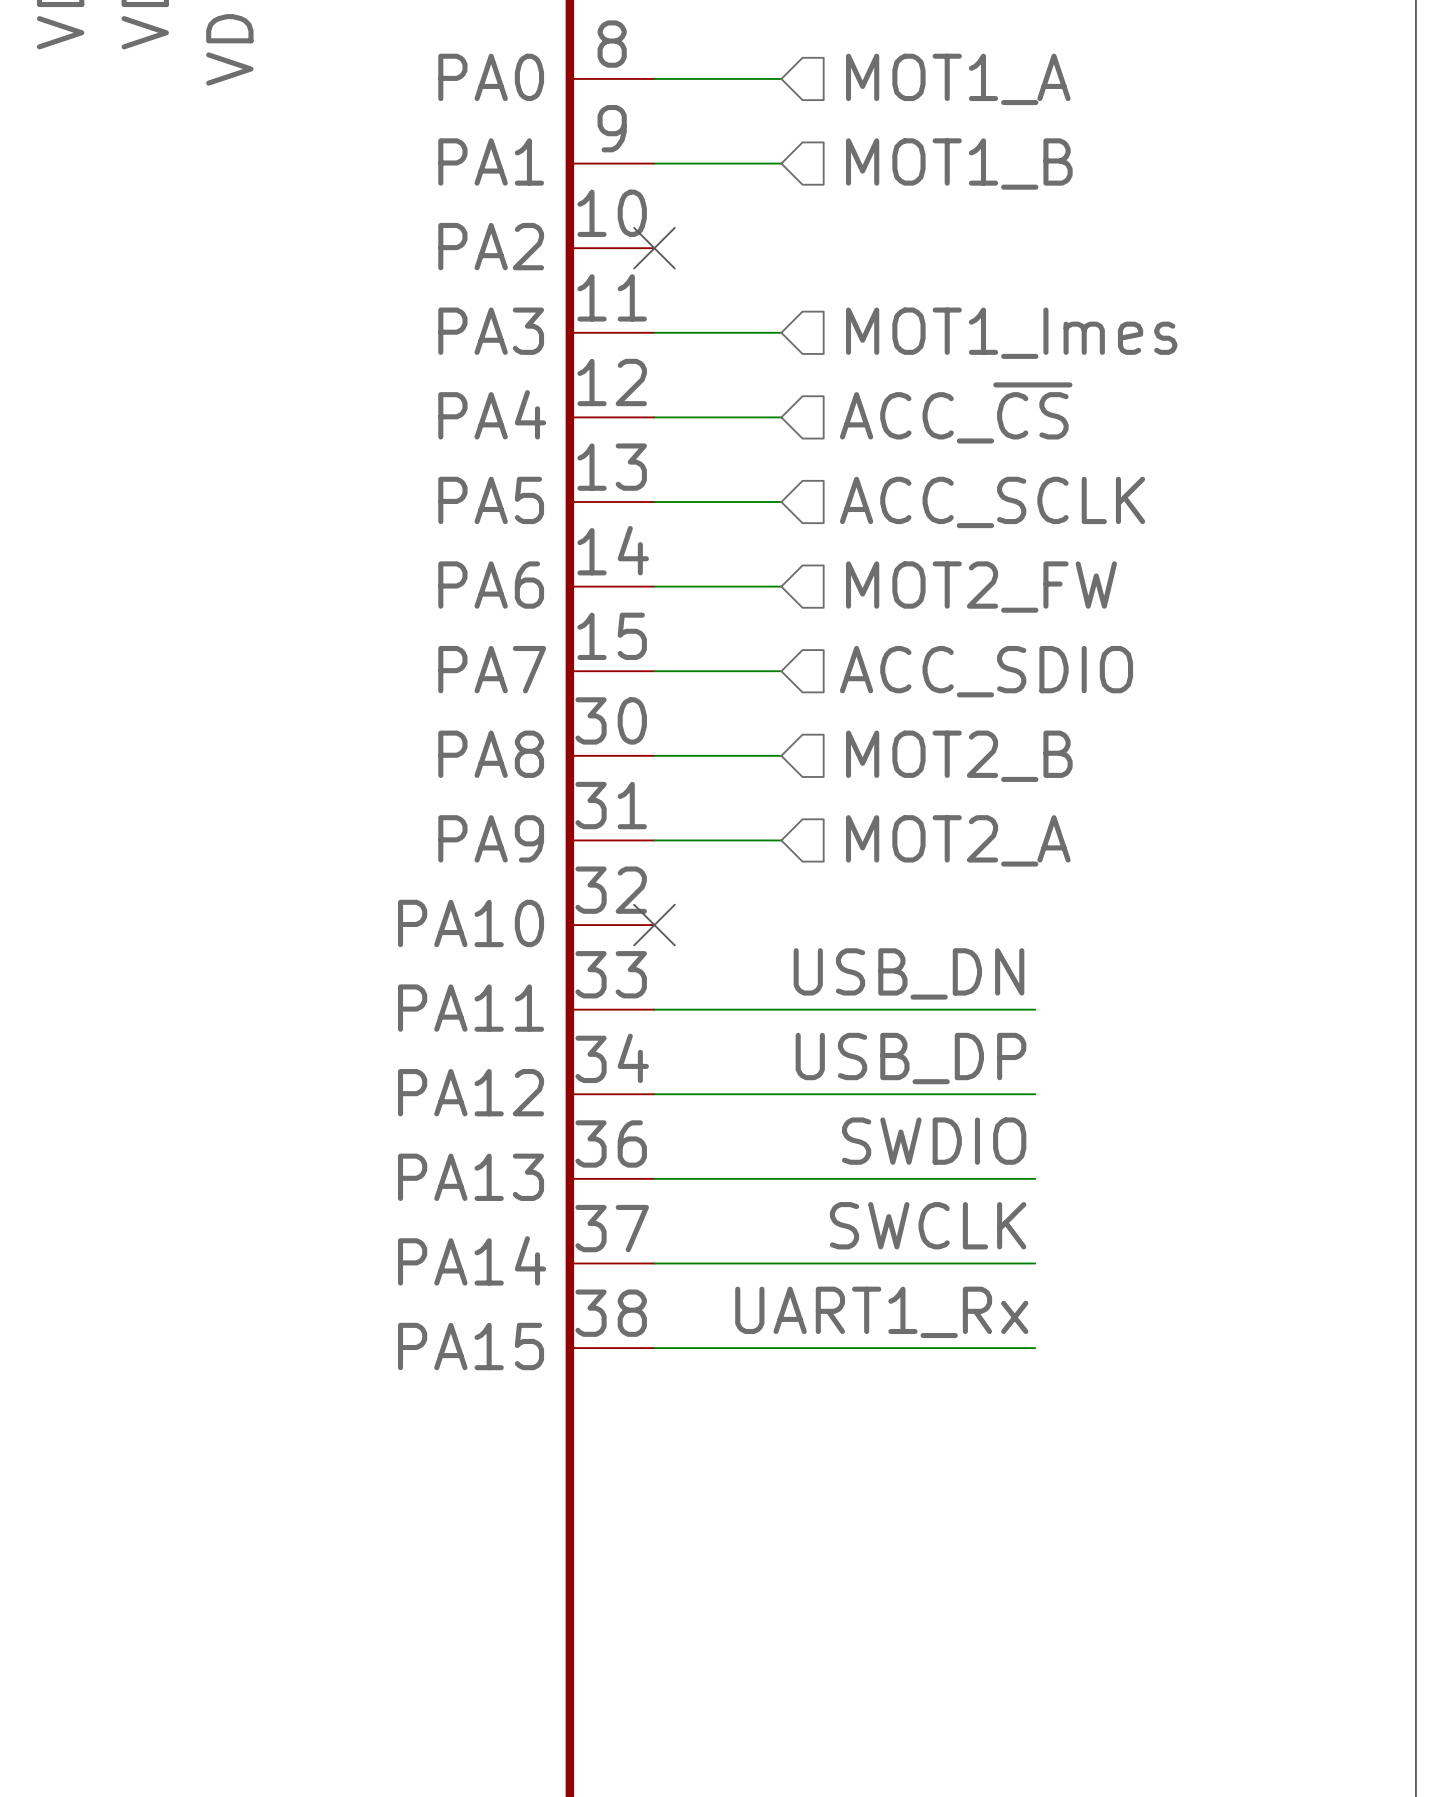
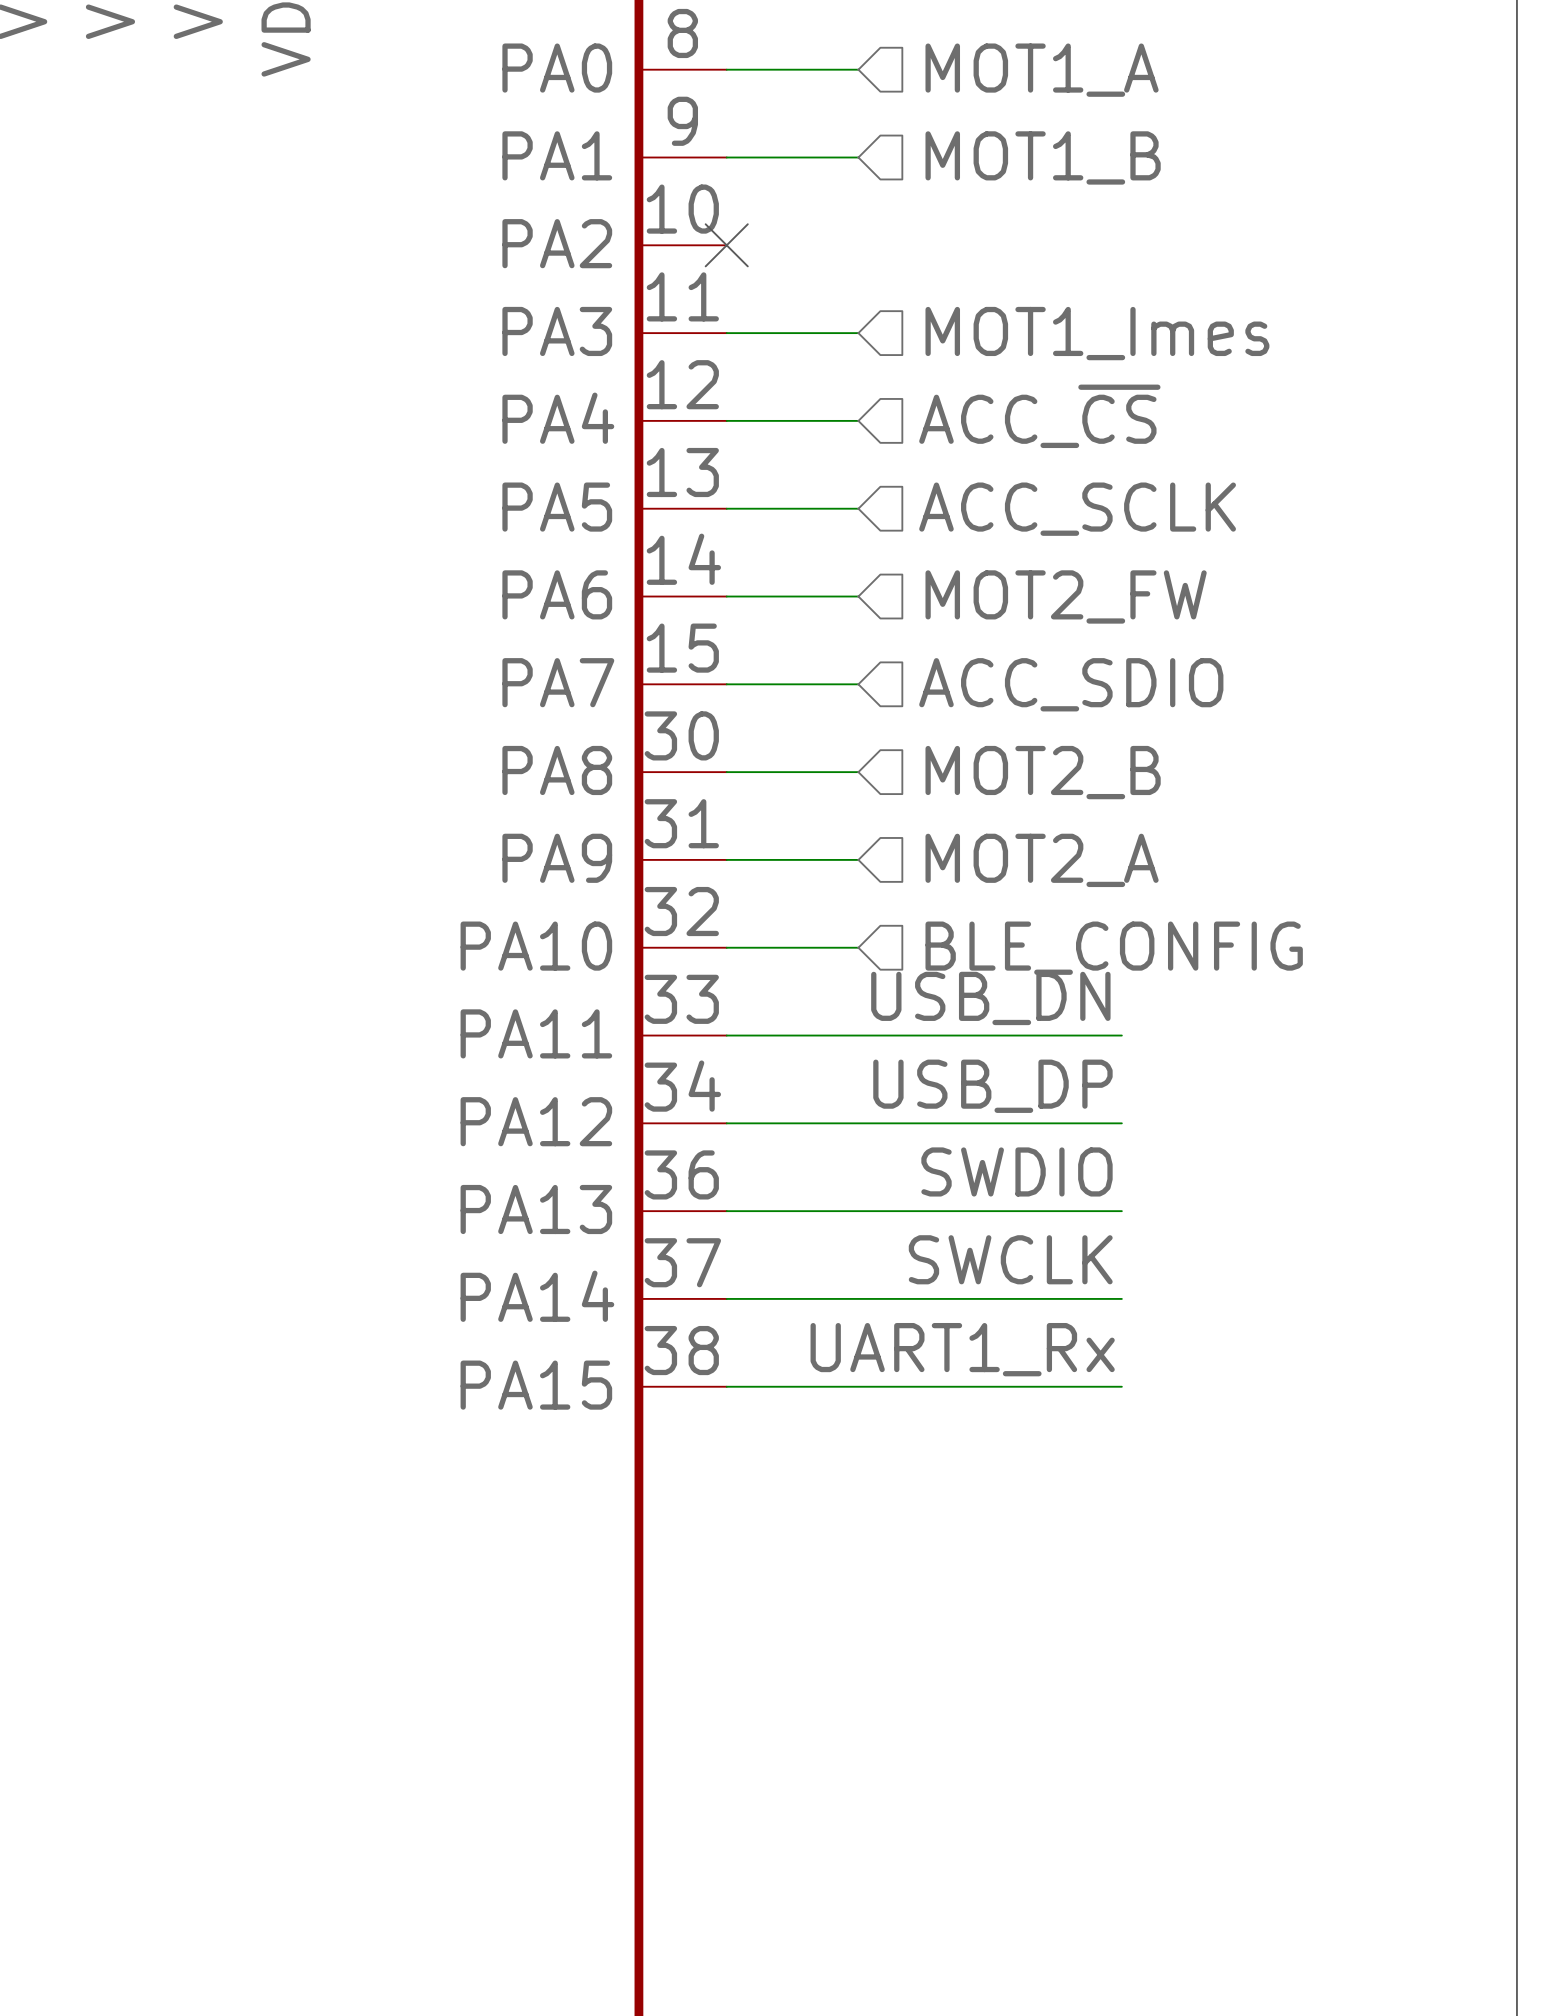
wire: none -> (726, 947) (858, 947)
no-connect mark: (654, 925) -> none
hierarchical label: none -> BLE_CONFIG (1114, 948)

